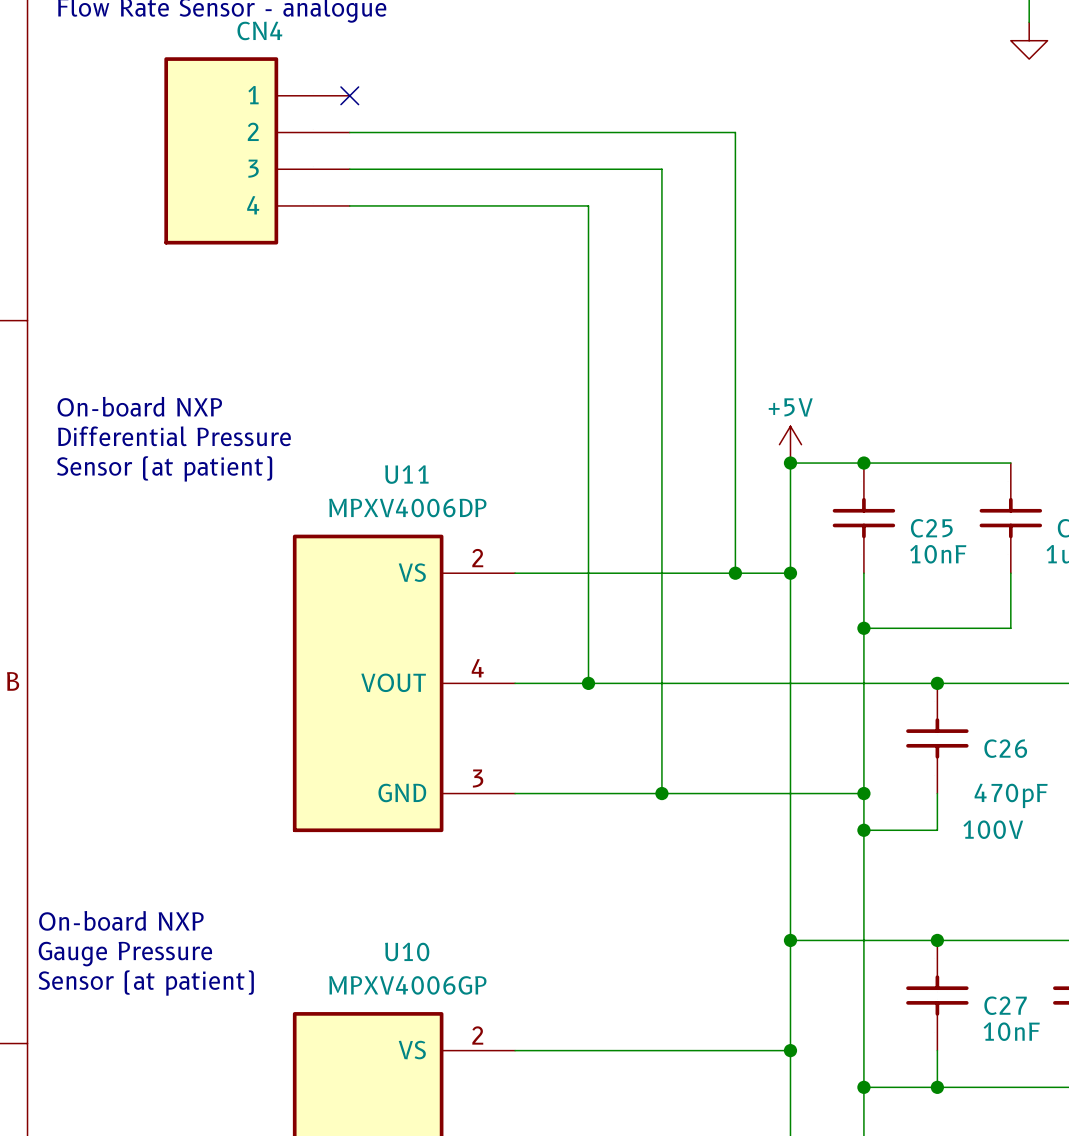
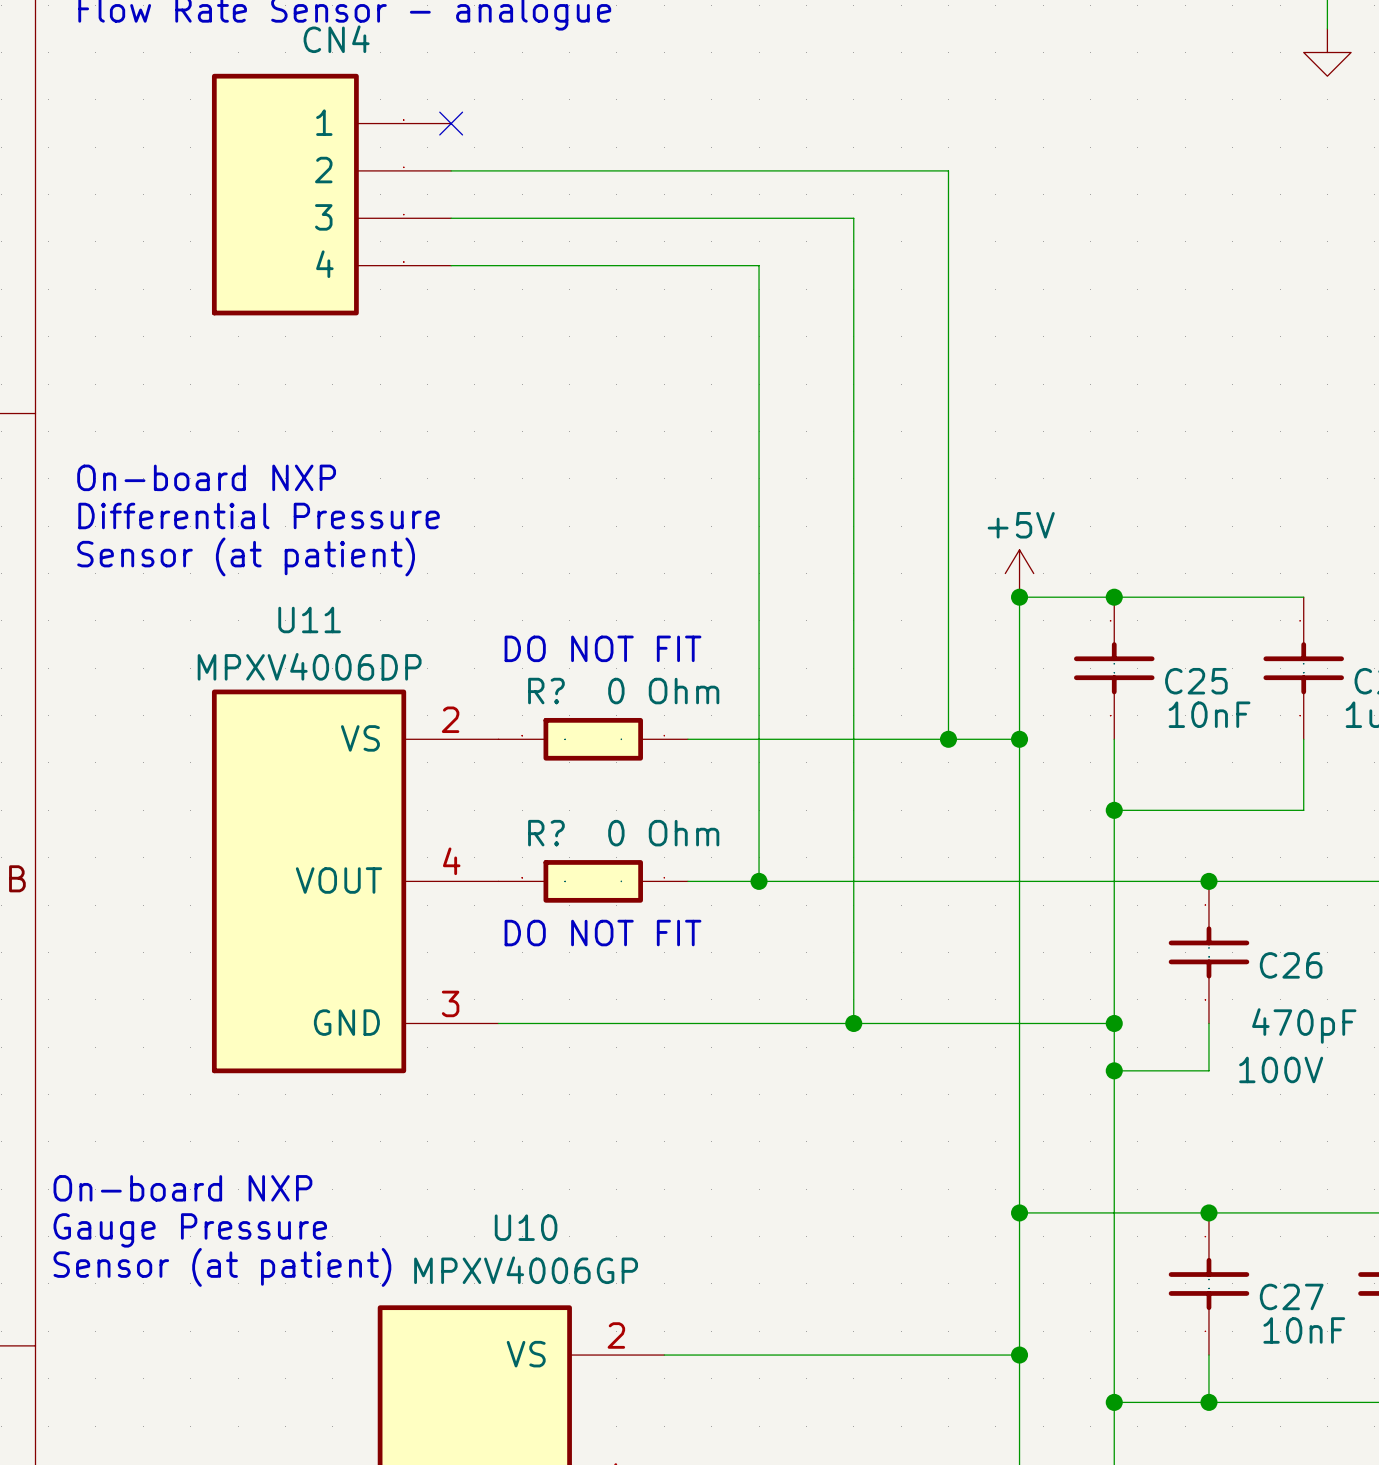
text position: On-board NXP (139, 406) -> On-board NXP (206, 477)
text position: Differential Pressure (174, 436) -> Differential Pressure (259, 515)
text position: Sensor (at patient) (164, 468) -> Sensor (at patient) (246, 556)
U11 name position: U11 (406, 474) -> U11 (309, 620)
text: none -> DO NOT FIT (603, 648)
U11 value position: MPXV4006DP (407, 508) -> MPXV4006DP (309, 666)
R?: none -> (593, 739)
U11 position: (403, 683) -> (355, 881)
R?: none -> (593, 881)
text: none -> DO NOT FIT (603, 933)

